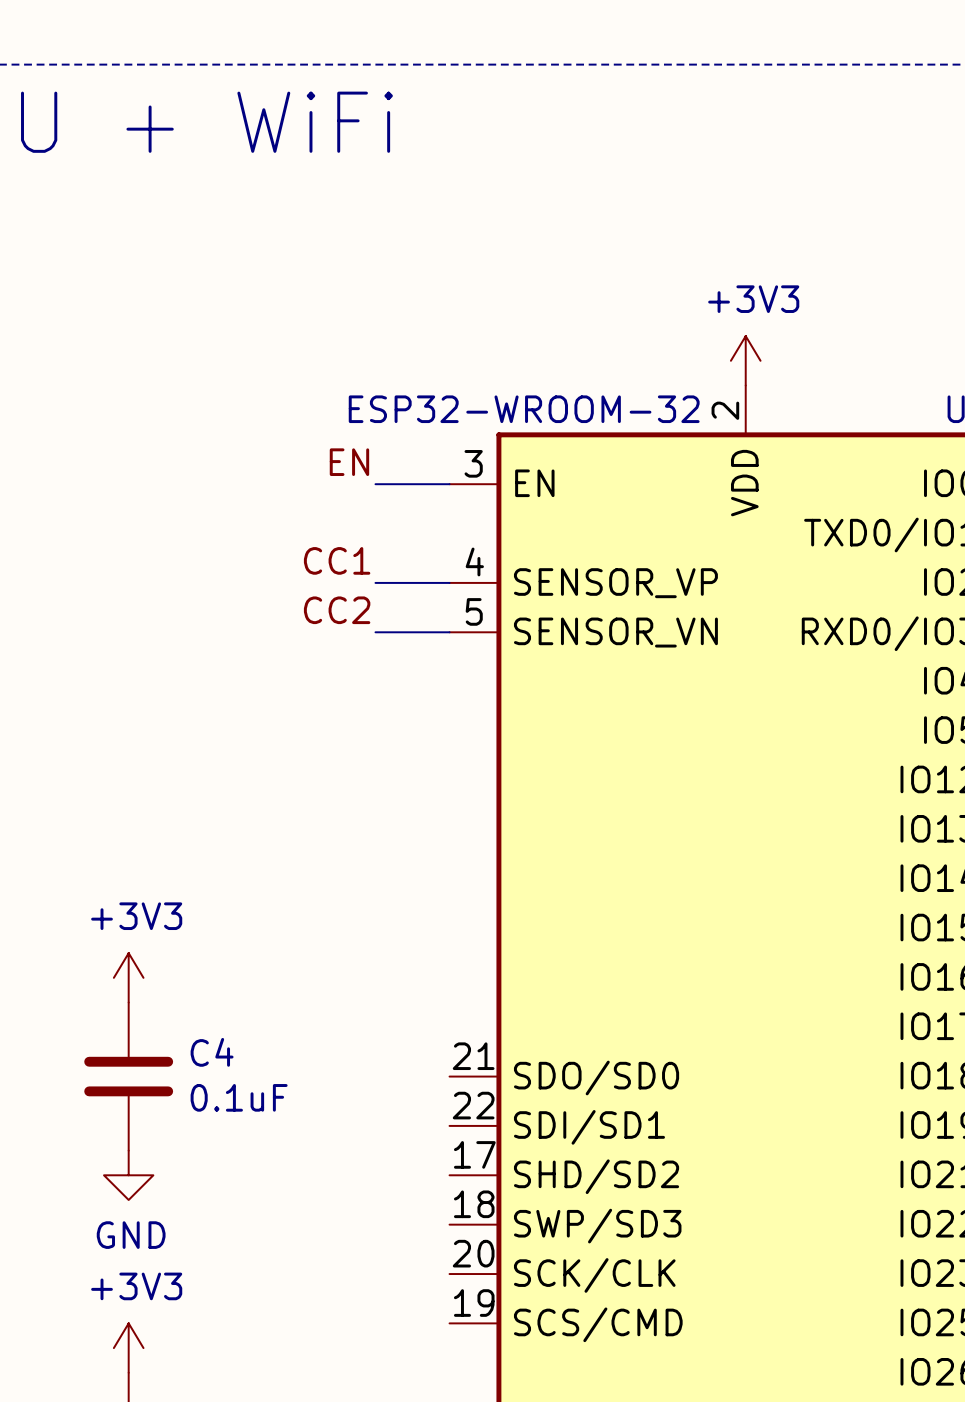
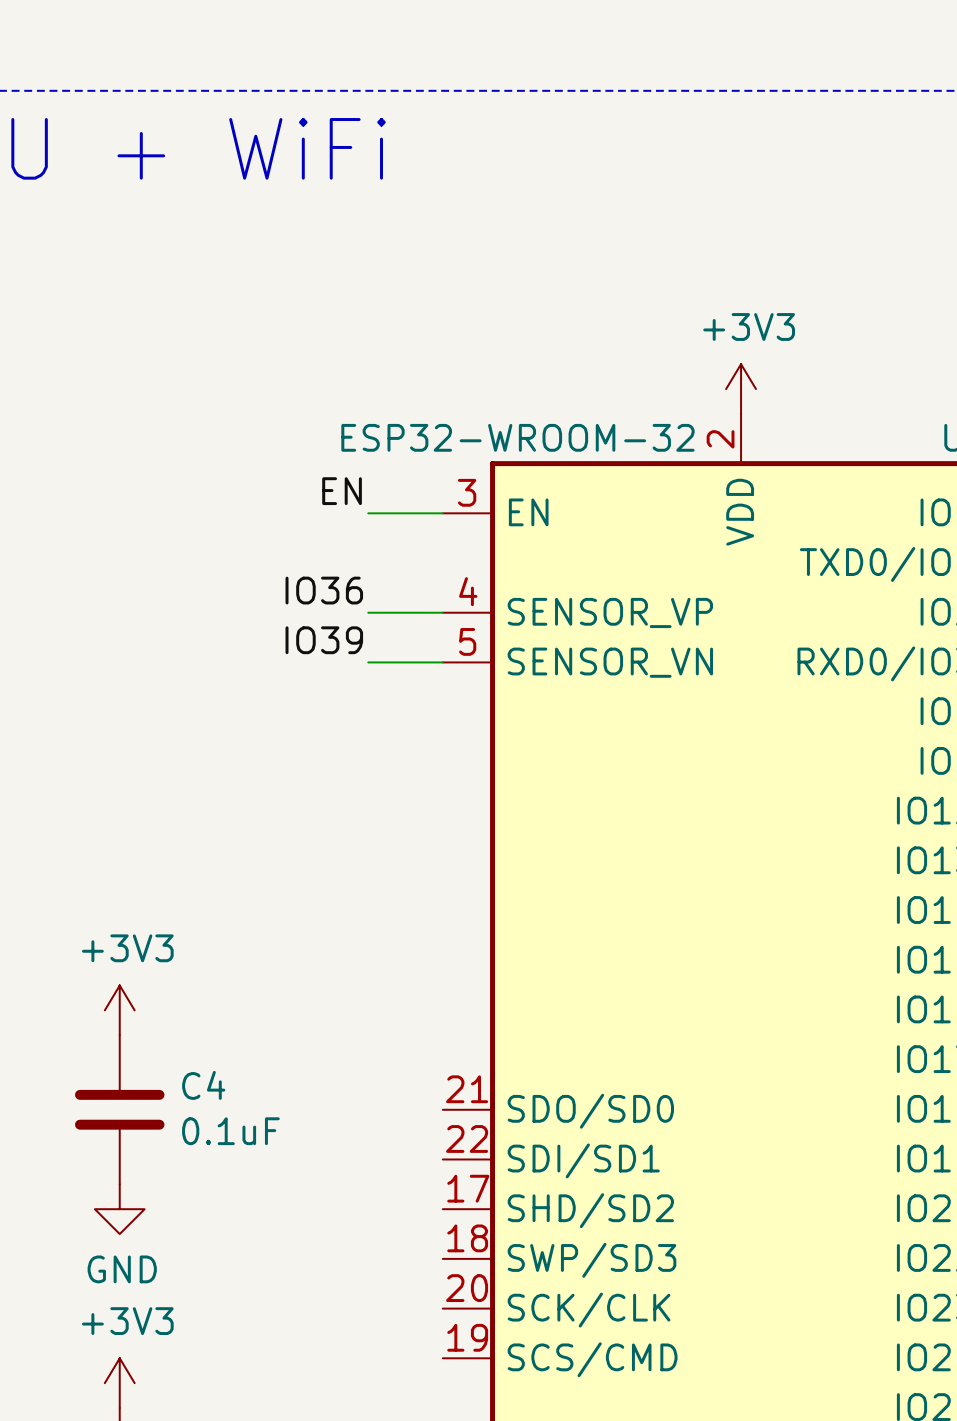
label: CC1 (337, 560) -> IO36 (324, 590)
label: CC2 (337, 610) -> IO39 (324, 640)

